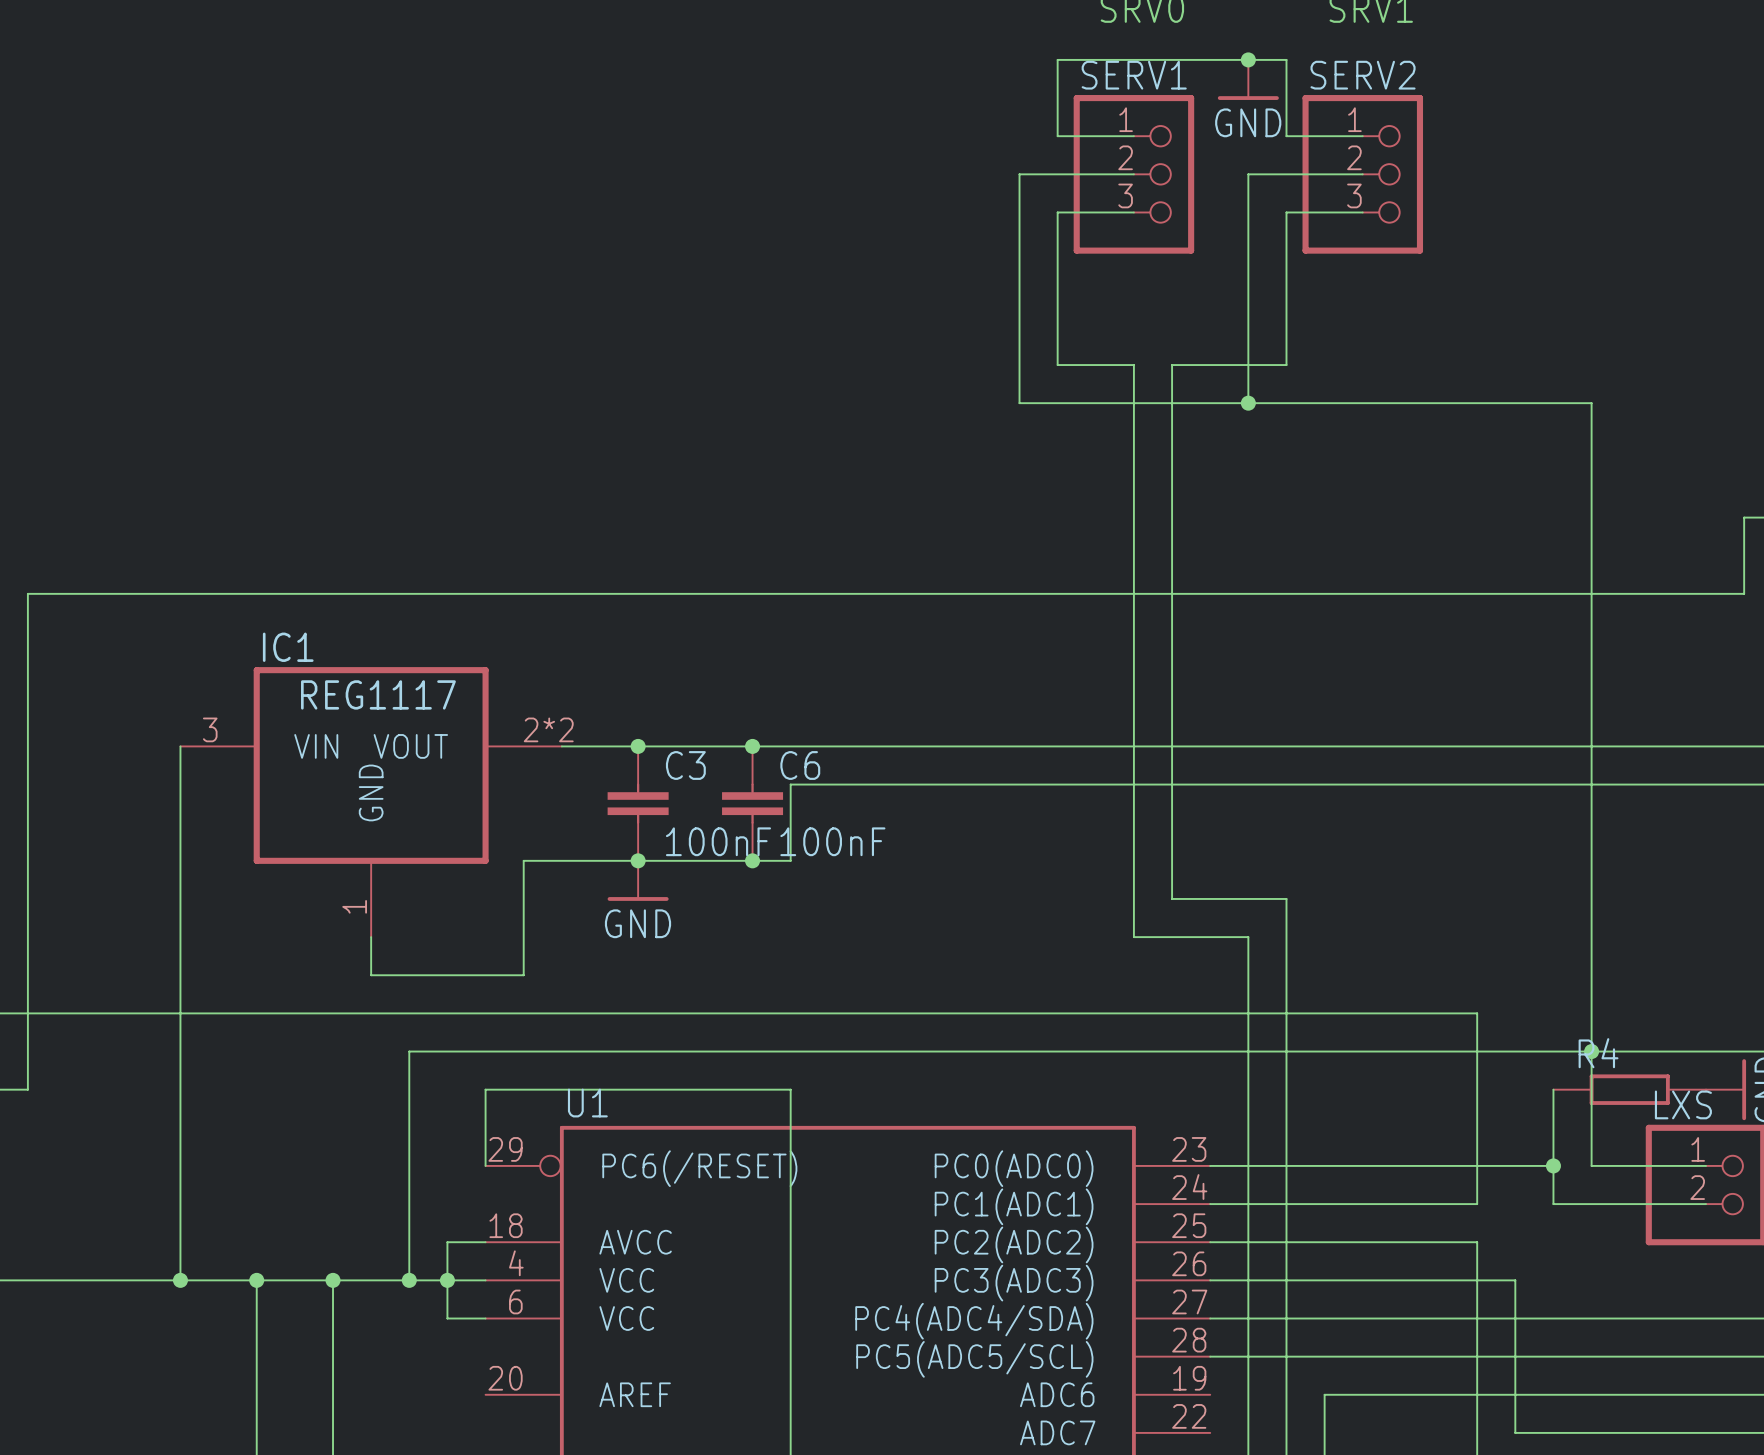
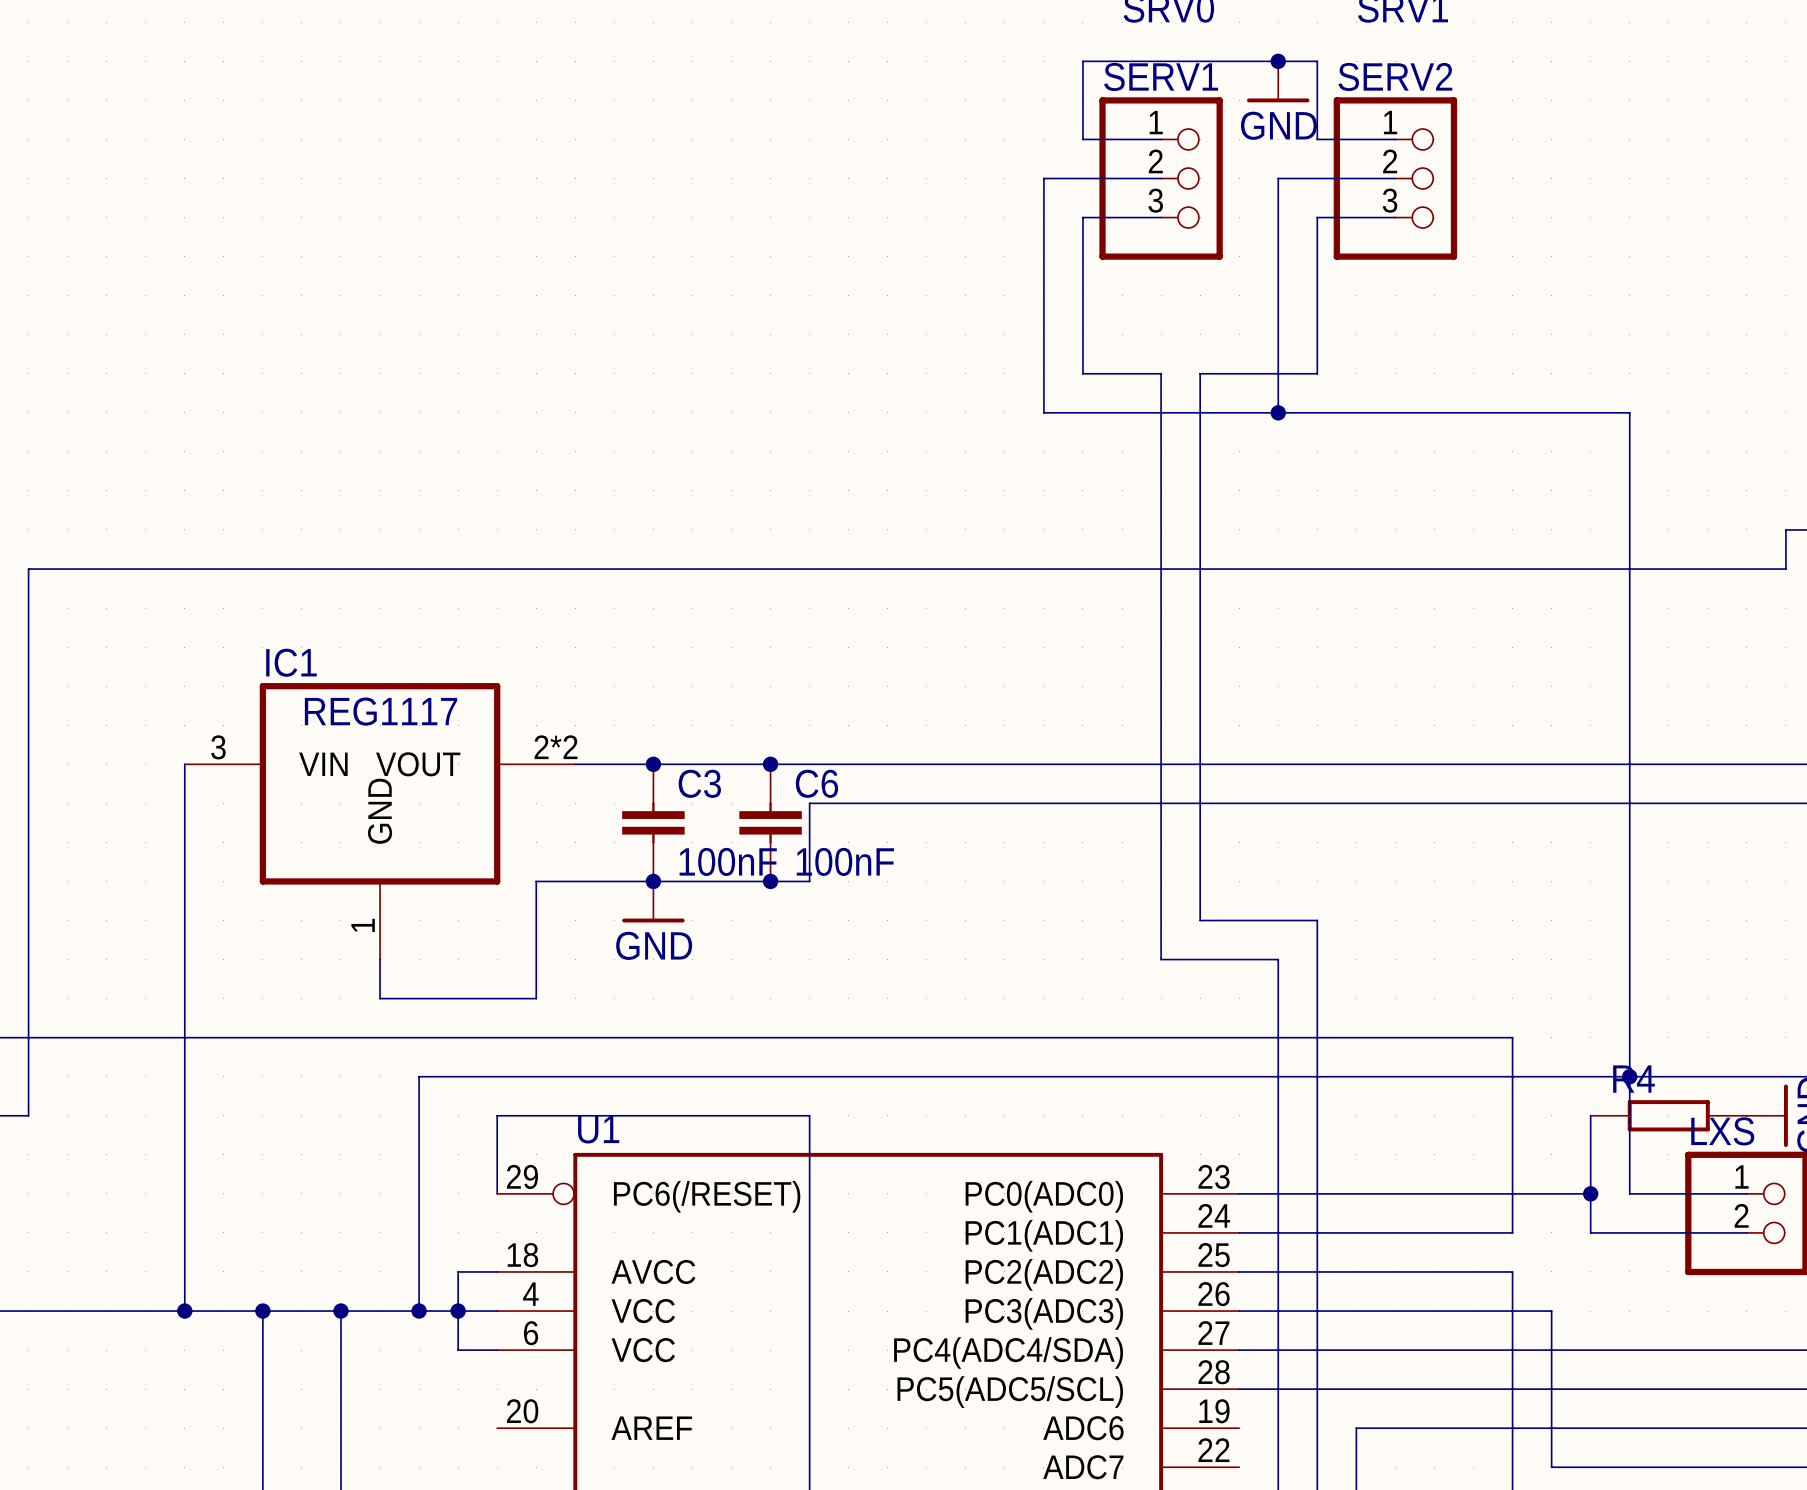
wire: (1744, 555) (1744, 593) (27, 593) -> (1785, 569) (28, 569) (28, 608)

